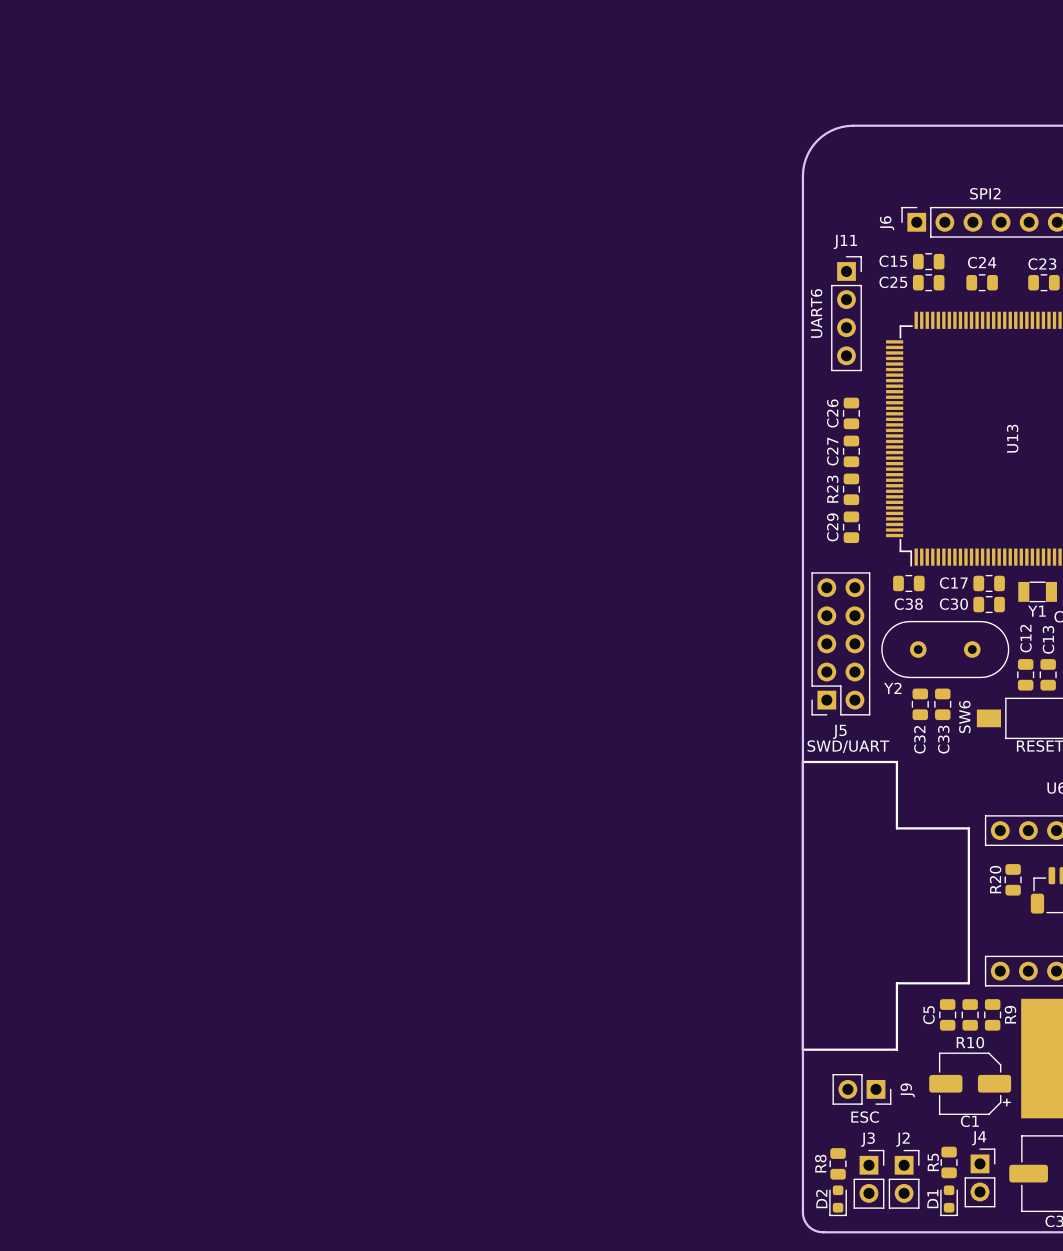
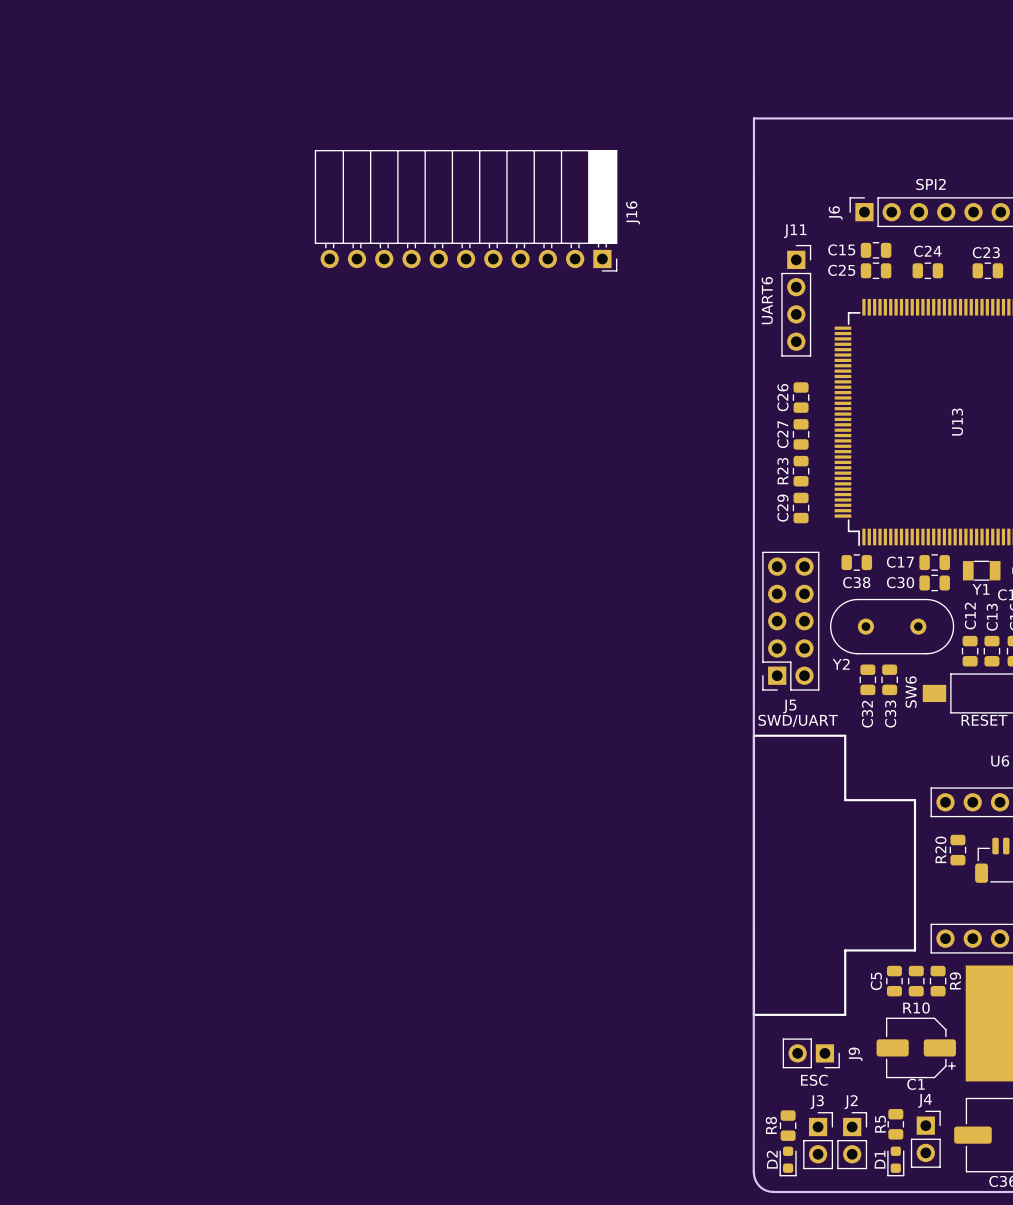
board edge: (853, 125) (836, 128) (817, 140) (807, 154) (802, 175) -> none
board edge: (802, 175) (802, 1212) -> (802, 118) (753, 118) (753, 1173)
J16: none -> (466, 210)

